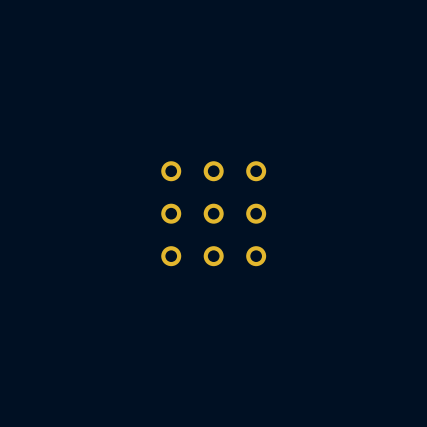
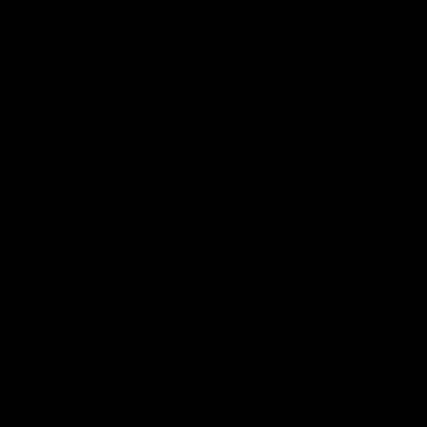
part: (213, 213) -> none

